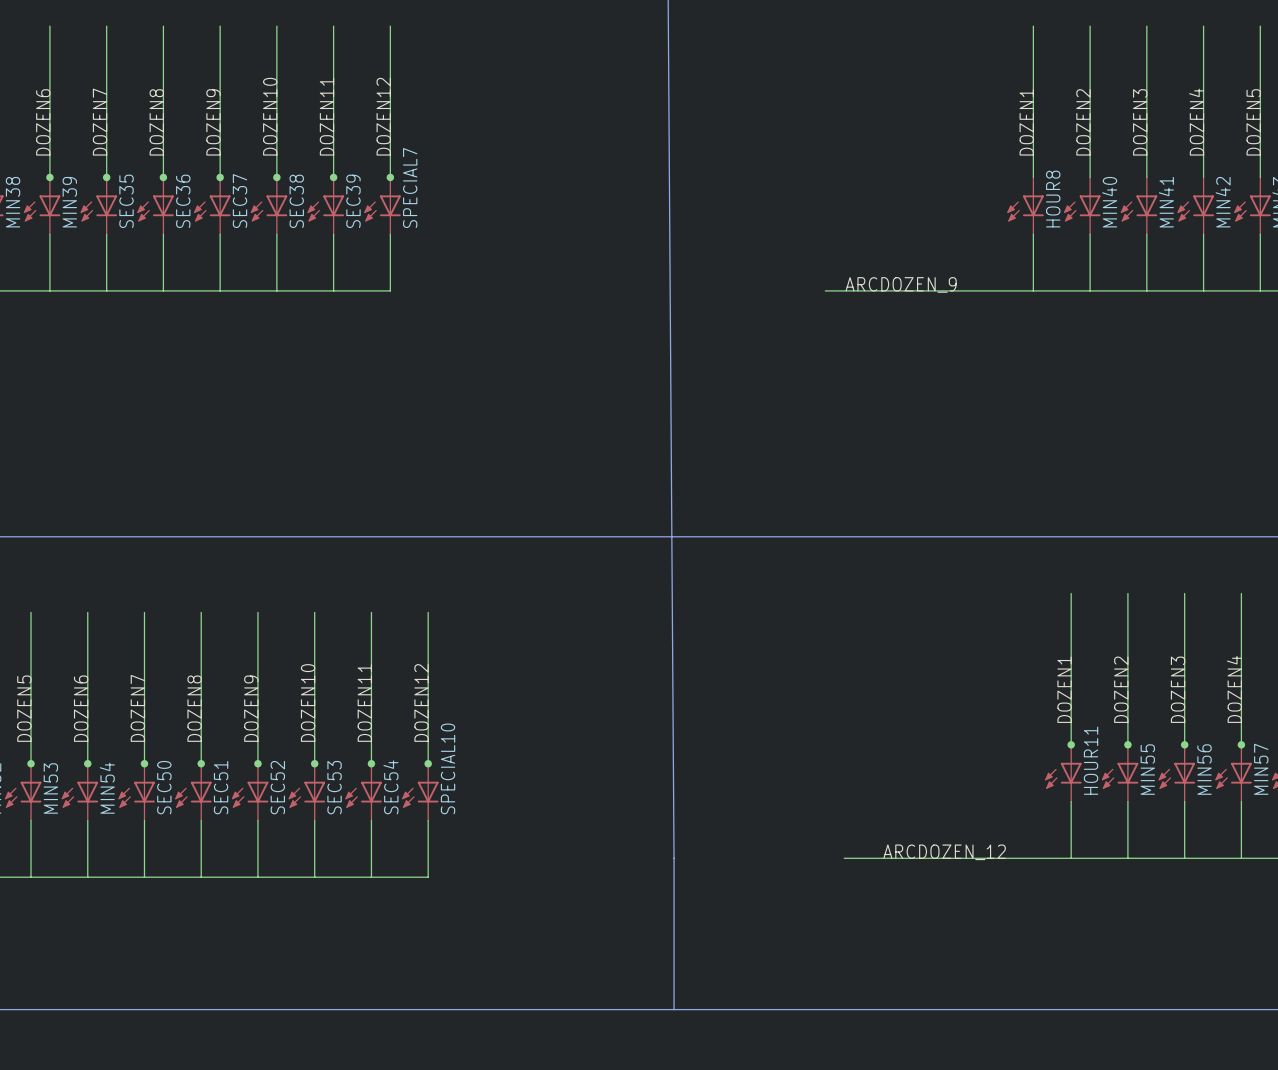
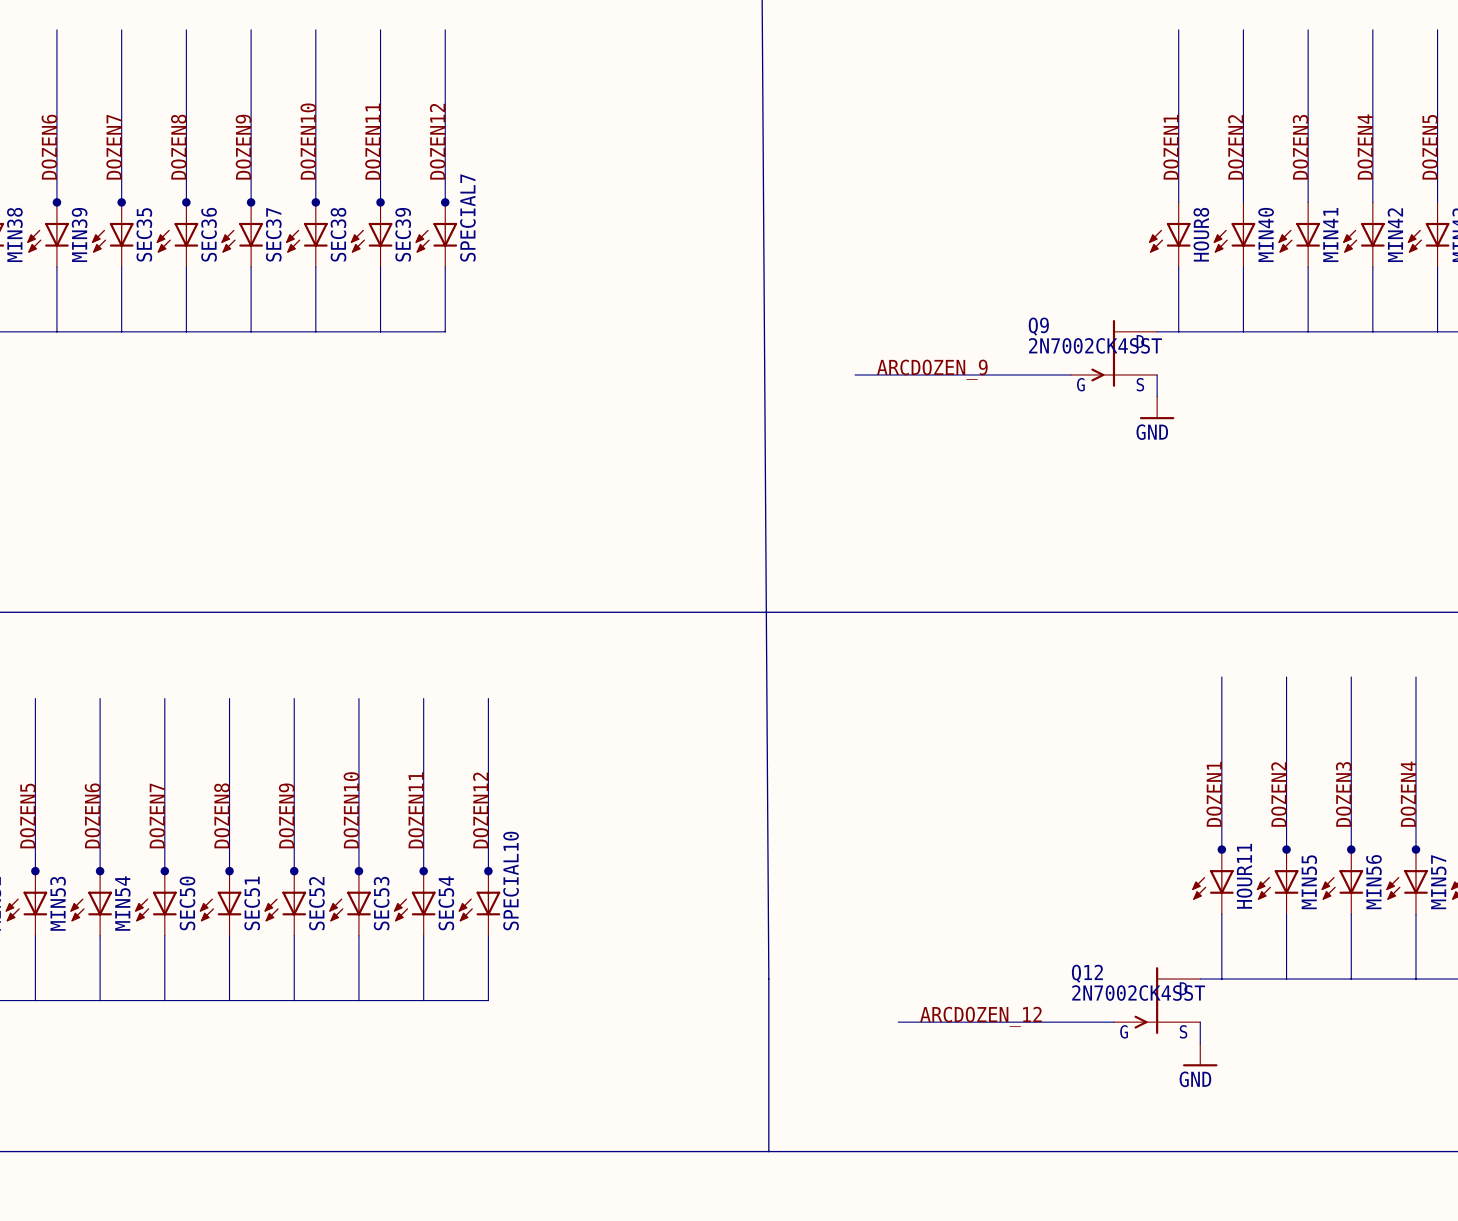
label position: ARCDOZEN_9 (901, 284) -> ARCDOZEN_9 (932, 369)
wire: (825, 290) (1014, 290) -> (855, 374) (1070, 374)
Q9: none -> 2N7002CK4SST (1113, 353)
wire: none -> (1157, 374) (1157, 396)
power symbol: none -> GND (1157, 407)
label position: ARCDOZEN_12 (944, 852) -> ARCDOZEN_12 (980, 1016)
wire: (844, 858) (1052, 858) -> none
Q12: none -> 2N7002CK4SST (1157, 1000)
wire: none -> (898, 1022) (1113, 1022)
wire: none -> (1200, 1022) (1200, 1043)
power symbol: none -> GND (1200, 1055)

